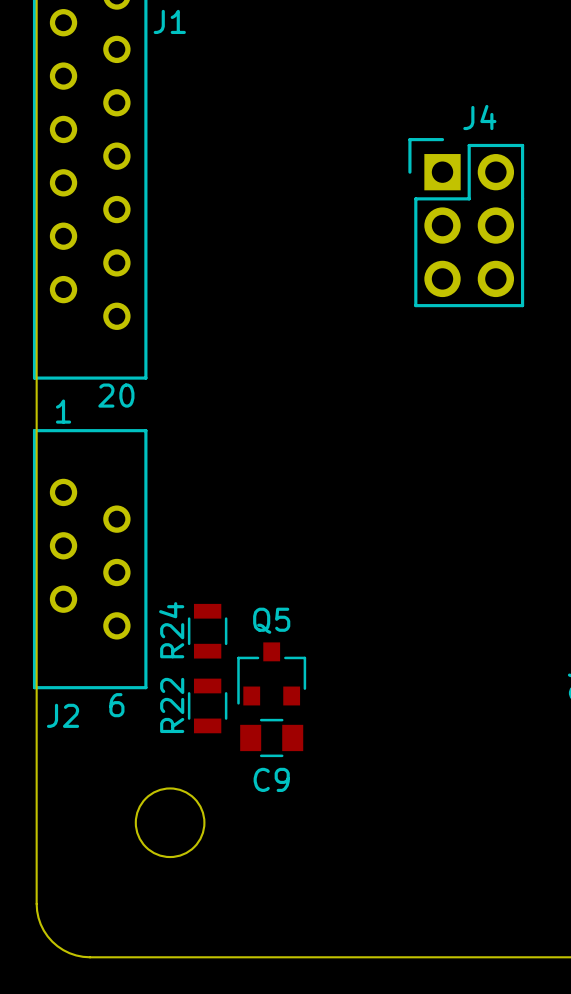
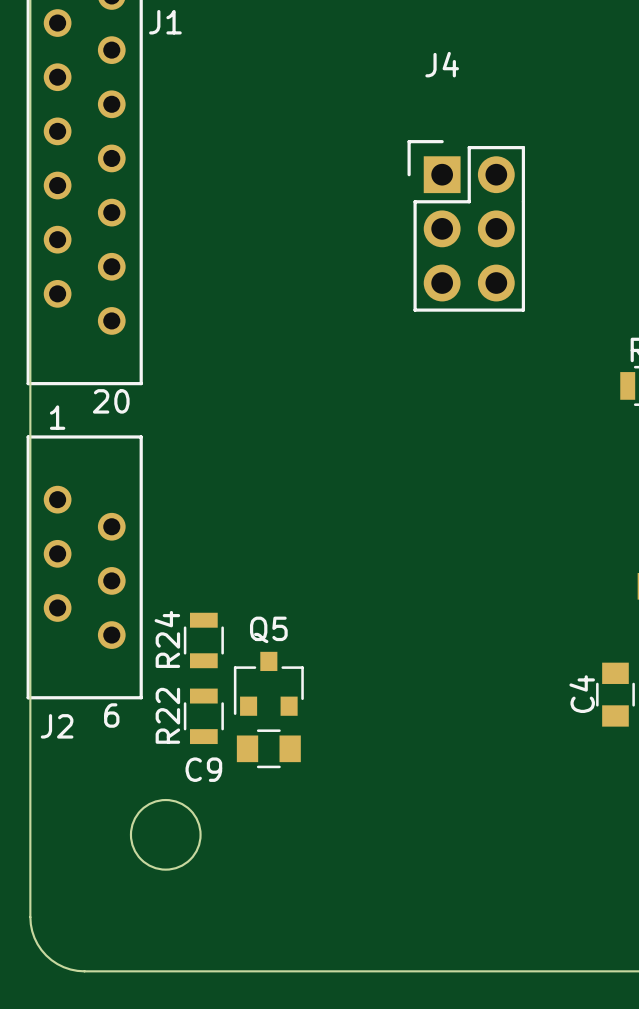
J4 name position: J4 (479, 117) -> J4 (442, 64)
C9 name position: C9 (271, 779) -> C9 (203, 769)

